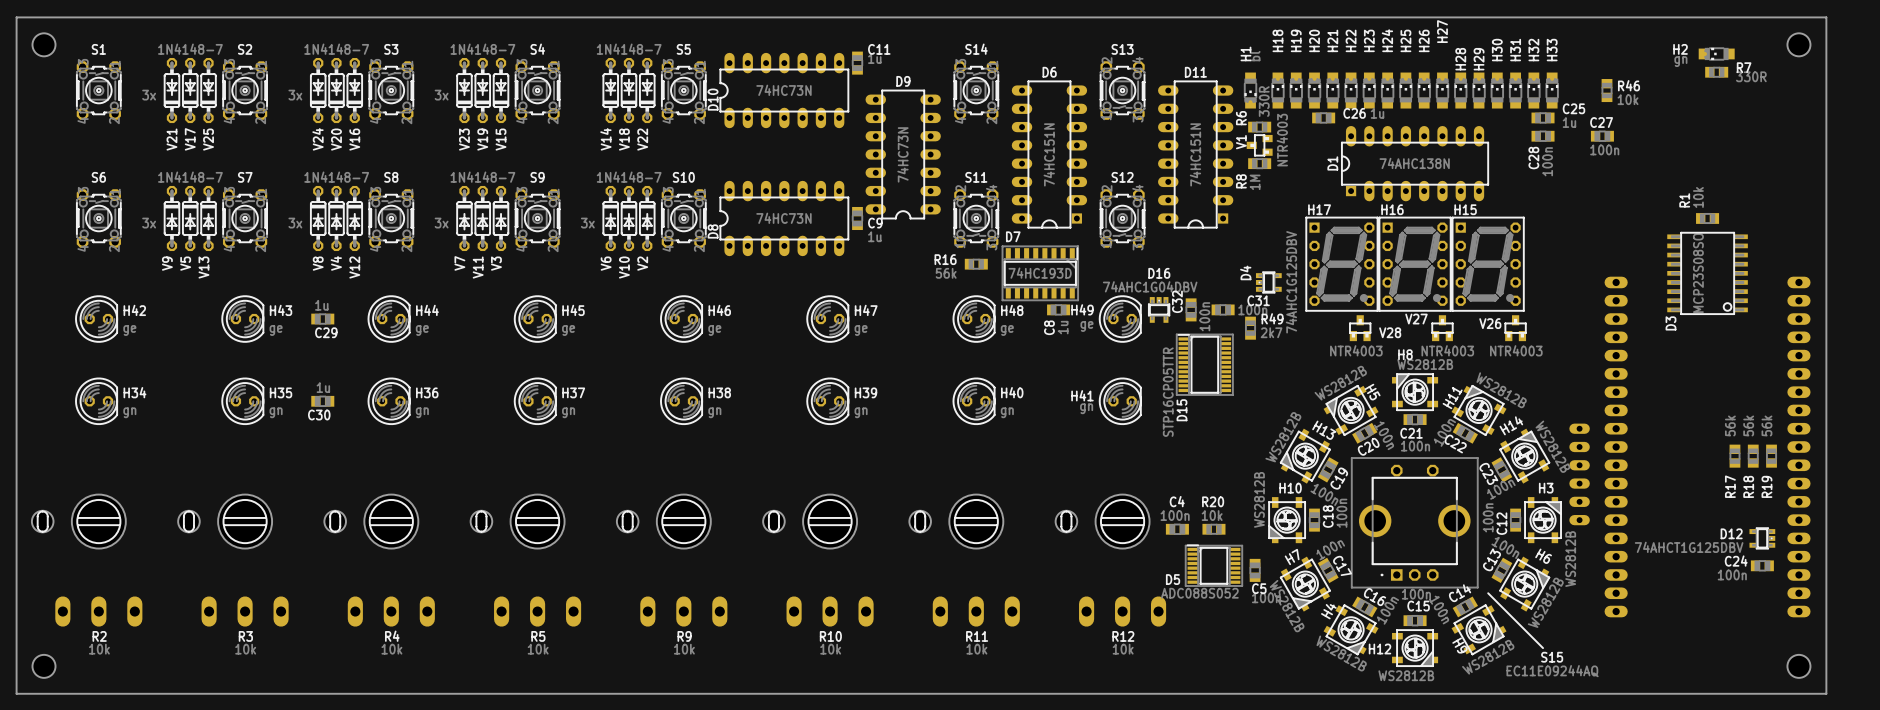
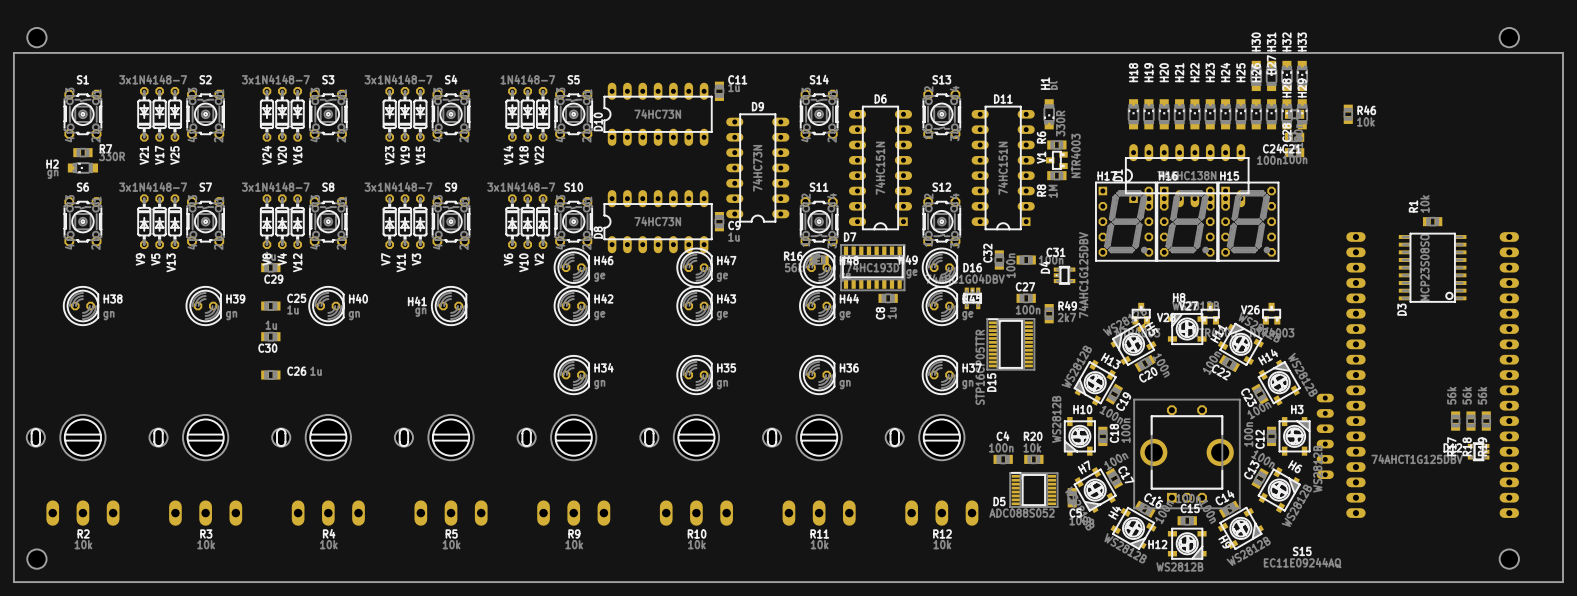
H2 position: (1716, 53) -> (82, 167)
board edge: (16, 63) (16, 17) (1826, 17) (1826, 693) -> (13, 52) (1563, 52) (1563, 582) (1532, 582)
C11 position: (857, 63) -> (719, 91)
R7 position: (1716, 72) -> (82, 152)
S1 position: (98, 90) -> (82, 114)
V21 position: (171, 90) -> (144, 114)
V17 position: (190, 90) -> (159, 114)
V25 position: (208, 90) -> (174, 114)
S2 position: (245, 90) -> (205, 114)
V24 position: (318, 90) -> (266, 114)
V20 position: (336, 90) -> (282, 114)
V16 position: (354, 90) -> (297, 114)
S3 position: (391, 90) -> (328, 114)
V19 position: (464, 90) -> (389, 114)
V23 position: (482, 90) -> (405, 114)
V15 position: (501, 90) -> (420, 114)
S4 position: (537, 90) -> (451, 114)
V14 position: (610, 90) -> (512, 114)
V18 position: (628, 90) -> (527, 114)
V22 position: (647, 90) -> (543, 114)
S5 position: (683, 90) -> (573, 114)
D10 position: (784, 90) -> (658, 114)
S14 position: (976, 90) -> (819, 114)
S13 position: (1122, 90) -> (941, 114)
H1 position: (1250, 90) -> (1049, 114)
H18 position: (1277, 90) -> (1133, 114)
H19 position: (1296, 90) -> (1148, 114)
H20 position: (1314, 90) -> (1164, 114)
H21 position: (1332, 90) -> (1179, 114)
H22 position: (1351, 90) -> (1194, 114)
H23 position: (1369, 90) -> (1210, 114)
H24 position: (1387, 90) -> (1225, 114)
H25 position: (1405, 90) -> (1240, 114)
H26 position: (1424, 90) -> (1256, 114)
H27 position: (1442, 90) -> (1271, 114)
H28 position: (1460, 90) -> (1286, 114)
H29 position: (1479, 90) -> (1302, 114)
R46 position: (1607, 90) -> (1348, 114)
C26 position: (1323, 117) -> (270, 375)
C25 position: (1543, 117) -> (270, 306)
R6 position: (1259, 127) -> (1056, 144)
C27 position: (1602, 136) -> (1026, 298)
V1 position: (1259, 145) -> (1056, 160)
D9 position: (903, 154) -> (757, 167)
D6 position: (1049, 154) -> (880, 167)
D11 position: (1195, 154) -> (1003, 167)
R8 position: (1259, 163) -> (1056, 175)
D1 position: (1415, 163) -> (1187, 175)
S6 position: (98, 218) -> (82, 221)
V9 position: (171, 218) -> (144, 221)
V5 position: (190, 218) -> (159, 221)
V13 position: (208, 218) -> (174, 221)
S7 position: (245, 218) -> (205, 221)
V4 position: (318, 218) -> (266, 221)
V8 position: (336, 218) -> (282, 221)
V12 position: (354, 218) -> (297, 221)
S8 position: (391, 218) -> (328, 221)
V7 position: (464, 218) -> (389, 221)
V11 position: (482, 218) -> (405, 221)
V3 position: (501, 218) -> (420, 221)
S9 position: (537, 218) -> (451, 221)
V6 position: (610, 218) -> (512, 221)
V10 position: (628, 218) -> (527, 221)
V2 position: (647, 218) -> (543, 221)
S10 position: (683, 218) -> (573, 221)
D8 position: (784, 218) -> (658, 221)
C9 position: (857, 218) -> (719, 221)
S11 position: (976, 218) -> (819, 221)
S12 position: (1122, 218) -> (941, 221)
R1 position: (1707, 218) -> (1432, 221)
R16 position: (976, 264) -> (819, 260)
D7 position: (1040, 273) -> (872, 267)
D3 position: (1707, 273) -> (1432, 267)
D4 position: (1268, 282) -> (1064, 275)
C8 position: (1058, 309) -> (888, 298)
D16 position: (1159, 309) -> (972, 298)
H42 position: (96, 319) -> (571, 306)
H43 position: (242, 319) -> (694, 306)
H44 position: (389, 319) -> (817, 306)
H45 position: (535, 319) -> (939, 306)
R49 position: (1250, 328) -> (1049, 313)
V28 position: (1360, 328) -> (1141, 313)
V27 position: (1442, 328) -> (1210, 313)
V26 position: (1515, 328) -> (1271, 313)
D15 position: (1204, 364) -> (1010, 344)
H34 position: (96, 401) -> (571, 375)
H35 position: (242, 401) -> (694, 375)
H36 position: (389, 401) -> (817, 375)
H37 position: (535, 401) -> (939, 375)
H38 position: (681, 401) -> (81, 306)
H39 position: (827, 401) -> (203, 306)
H40 position: (974, 401) -> (326, 306)
H41 position: (1120, 401) -> (449, 306)
C21 position: (1415, 419) -> (1294, 137)
R17 position: (1734, 456) -> (1455, 421)
R18 position: (1753, 456) -> (1470, 421)
R19 position: (1771, 456) -> (1486, 421)
part position: (1579, 474) -> (1325, 436)
S15 position: (1414, 522) -> (1186, 453)
C4 position: (1177, 529) -> (1003, 459)
R20 position: (1213, 529) -> (1033, 459)
D5 position: (1213, 565) -> (1033, 489)
C24 position: (1762, 565) -> (1294, 152)
C5 position: (1255, 570) -> (1072, 497)
line: (1488, 593) (1543, 648) -> none

